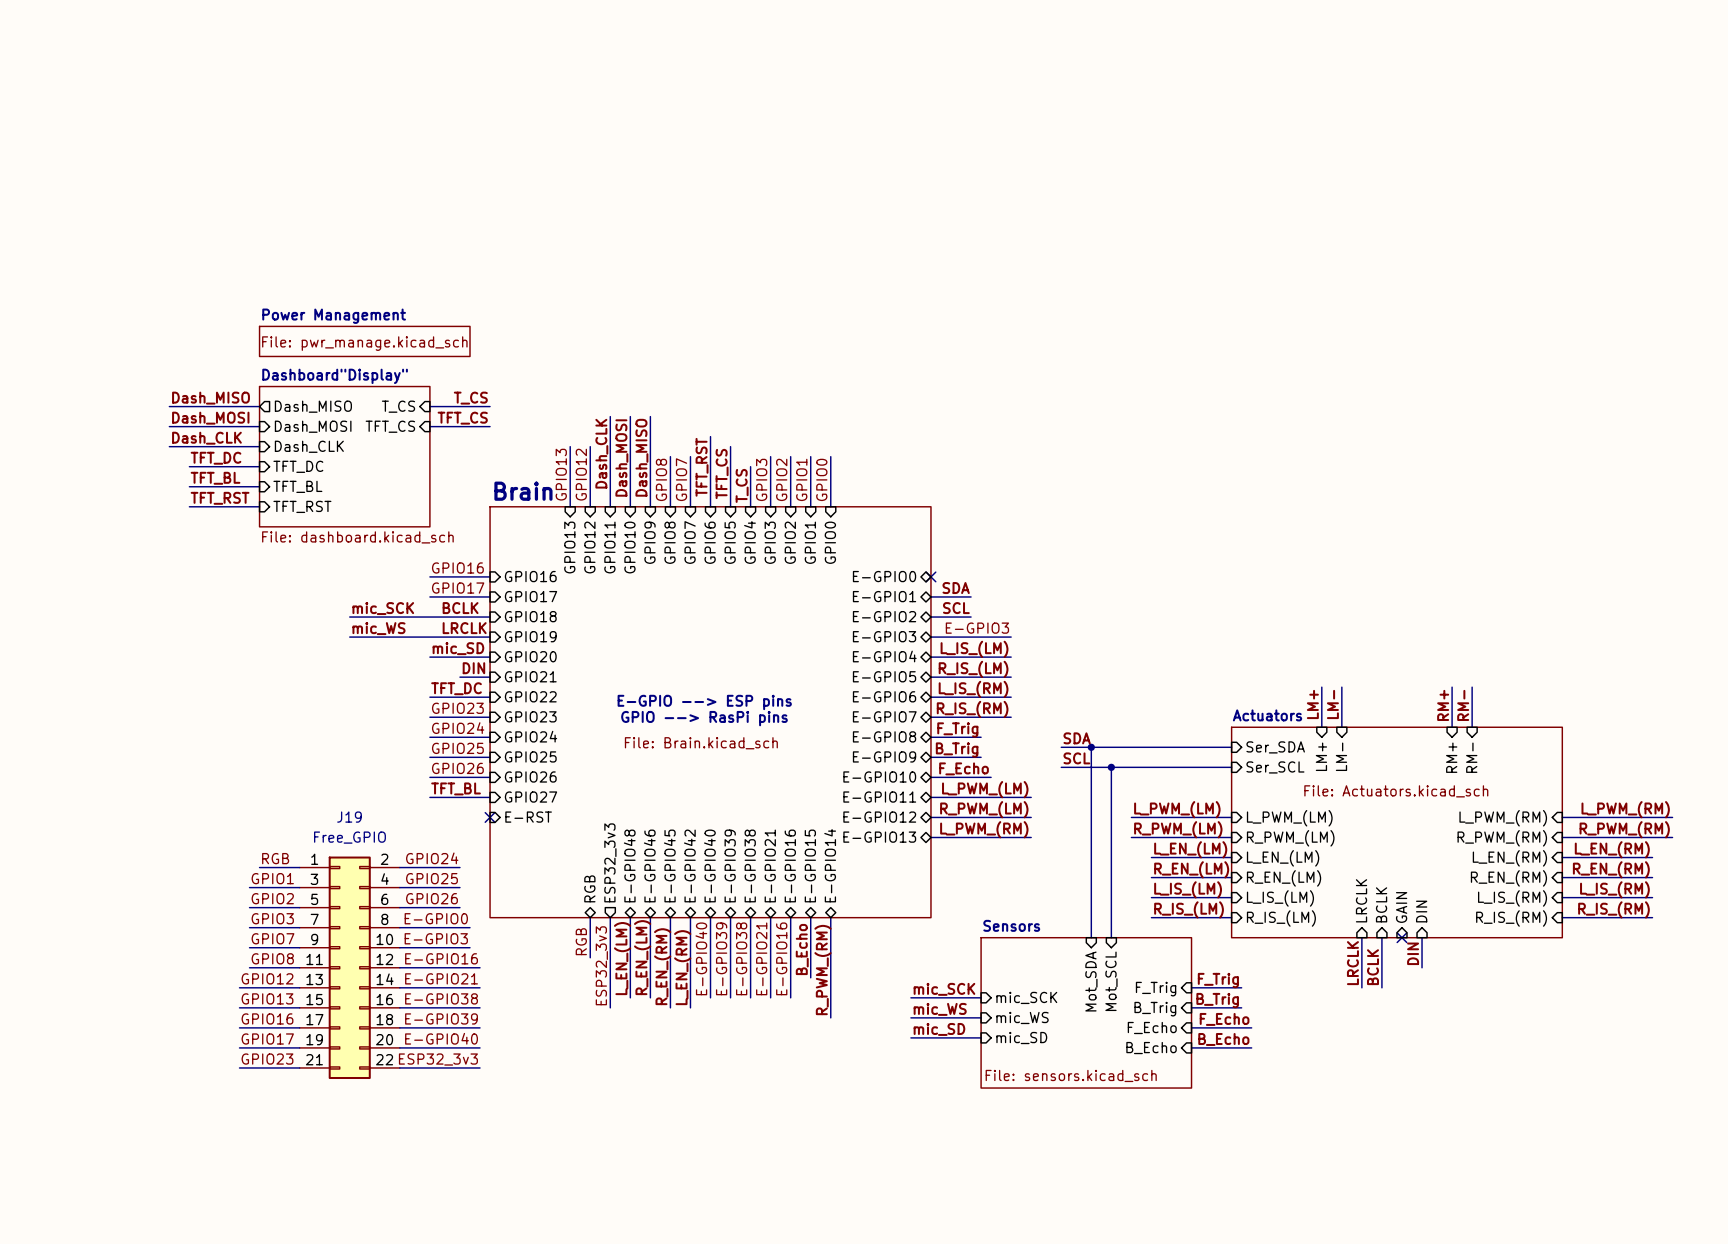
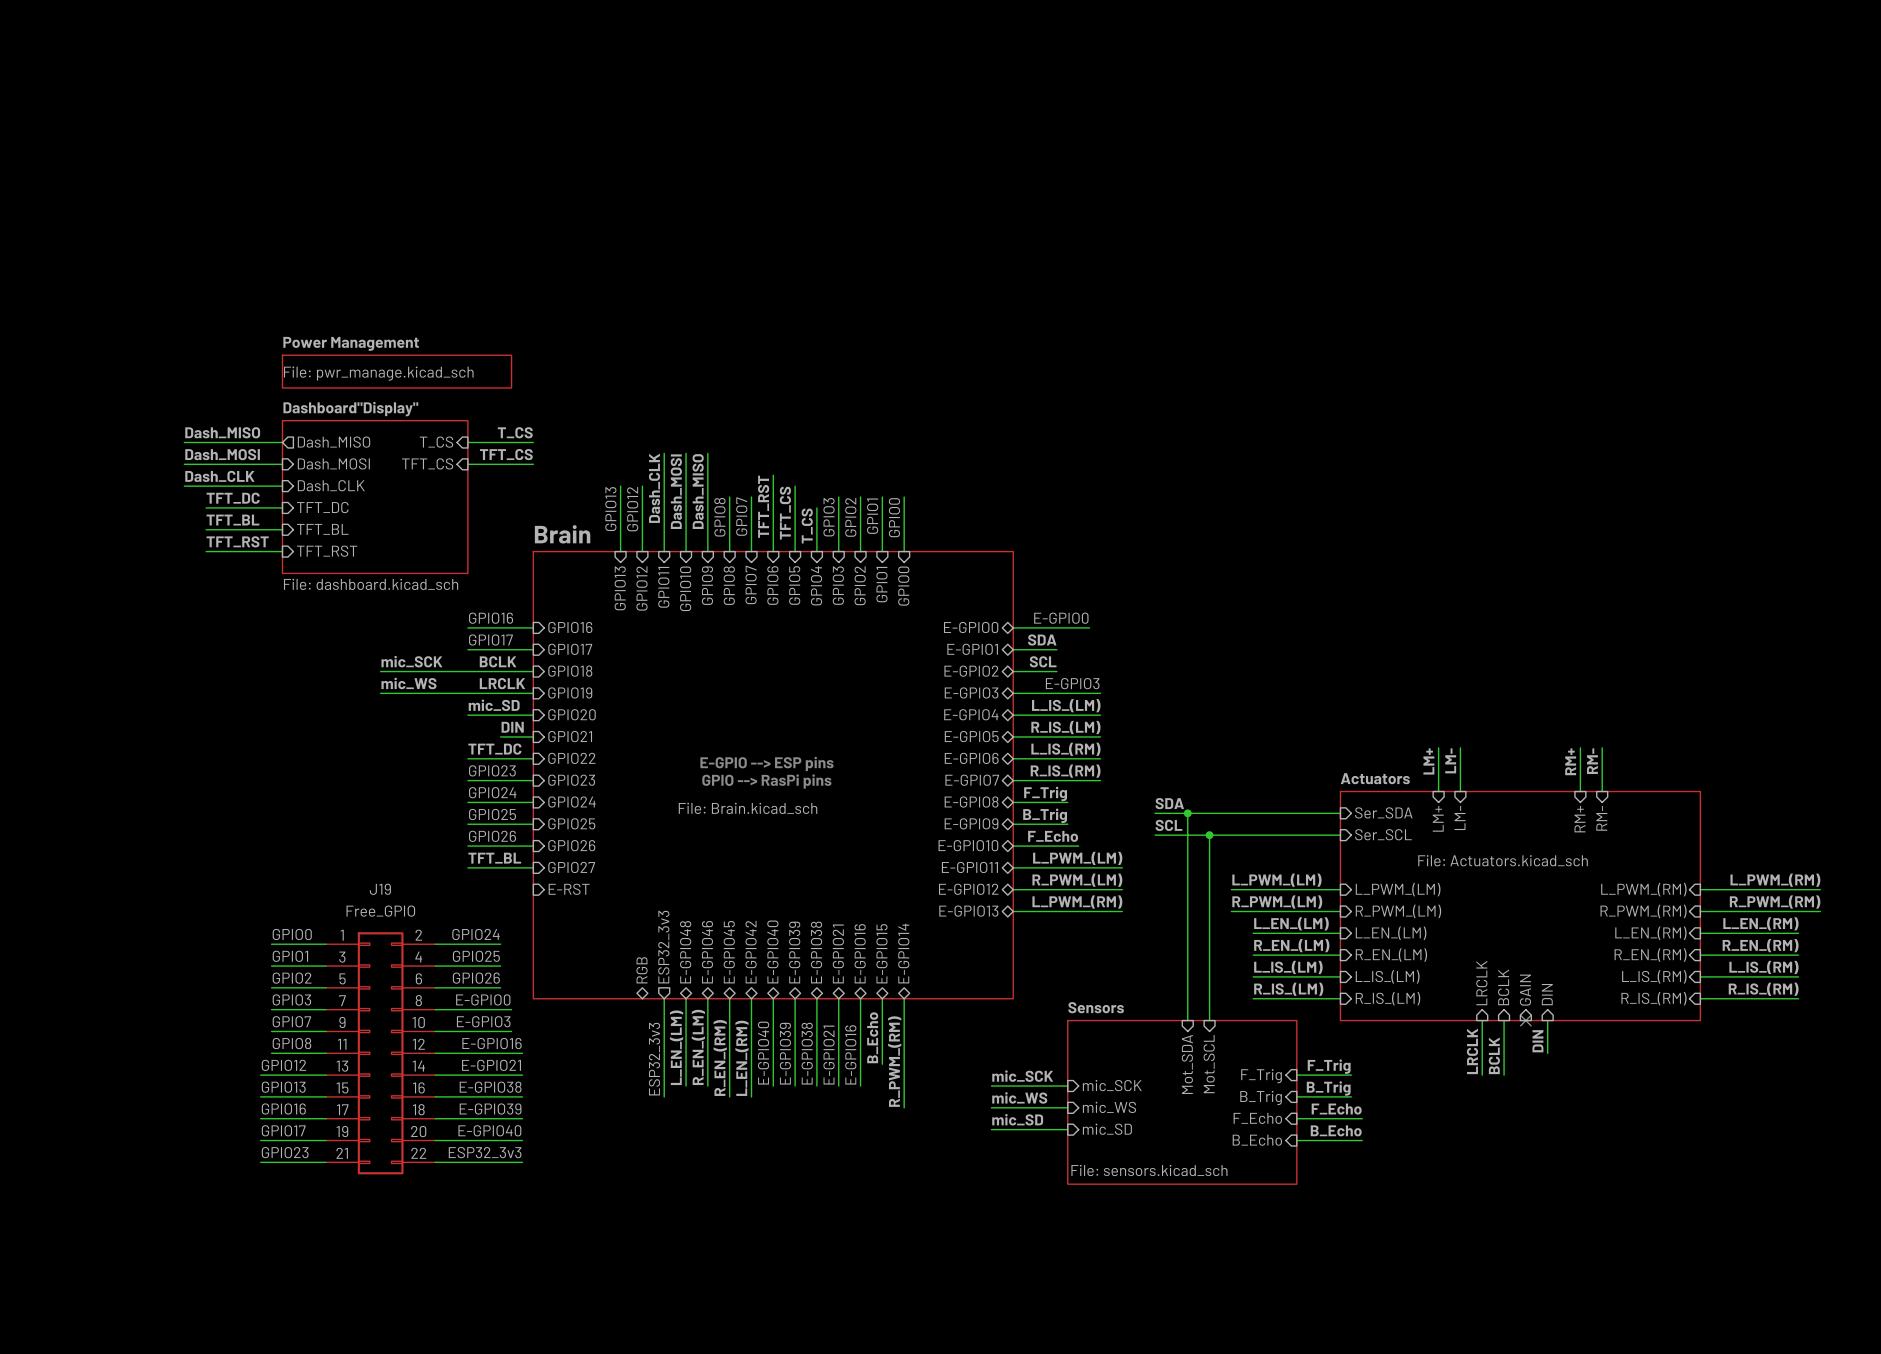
label: none -> E-GPIO0 (1061, 618)
wire: none -> (1013, 627) (1089, 627)
no-connect mark: (930, 576) -> none
no-connect mark: (490, 817) -> none
label: none -> GPIO0 (292, 934)
label: RGB (275, 858) -> none
wire: none -> (271, 944) (282, 944)
wire: (590, 917) (590, 957) -> none
label: RGB (581, 941) -> none

